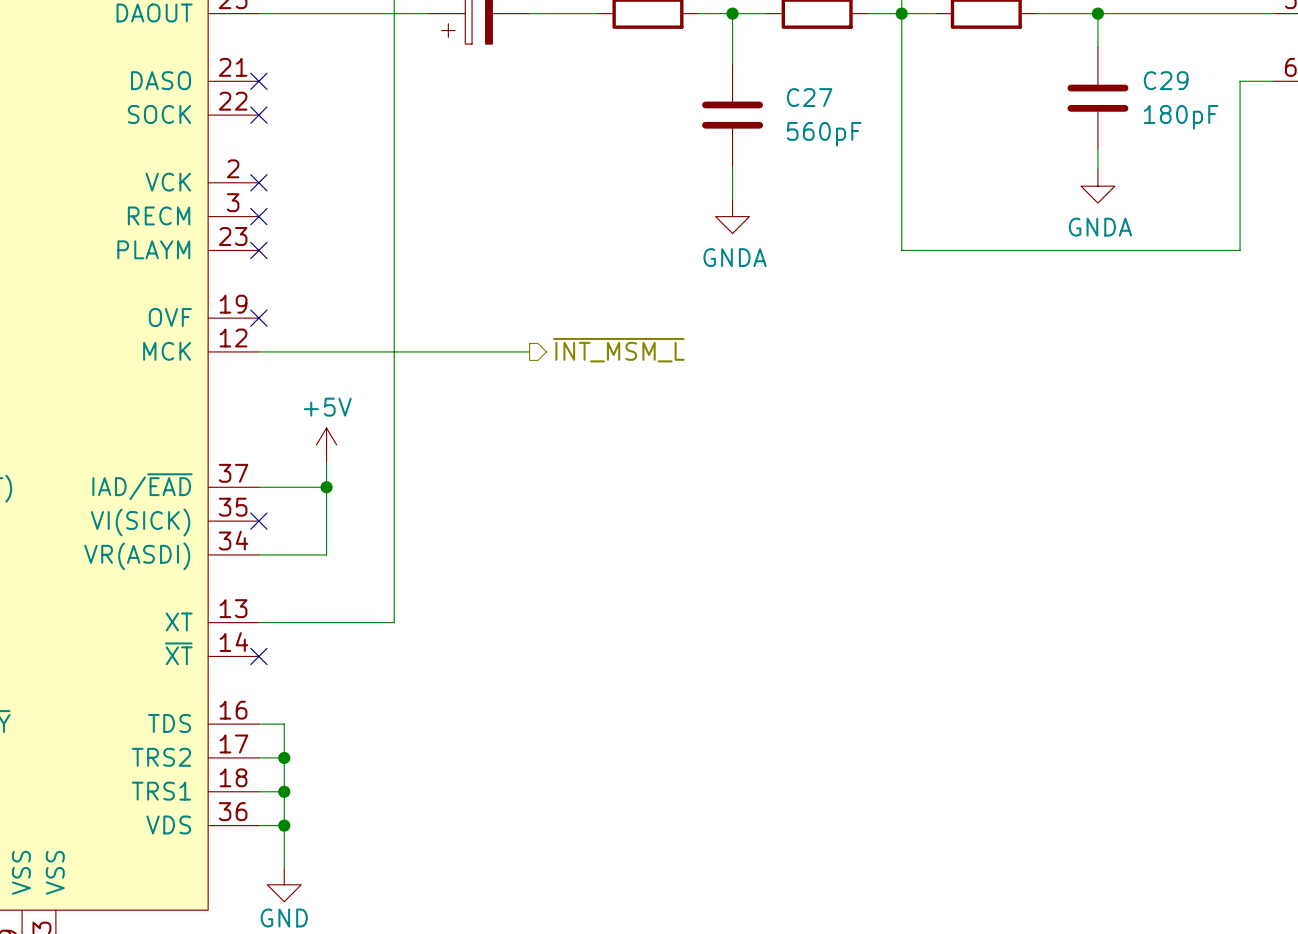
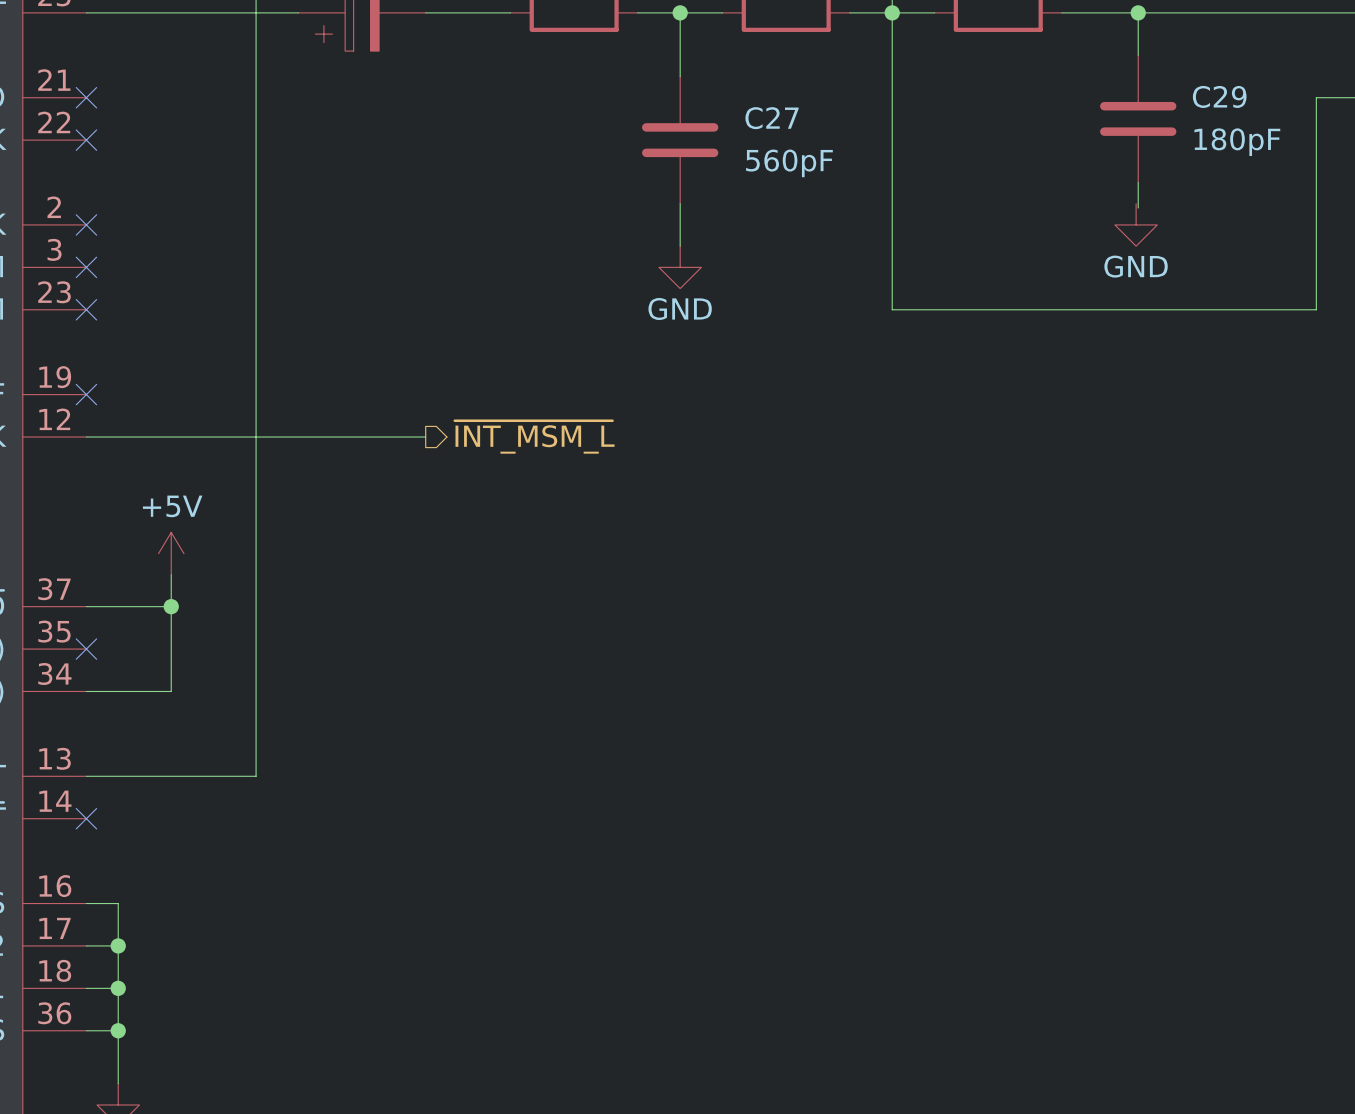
power symbol: GNDA (1097, 186) -> GND (1136, 224)
power symbol: GNDA (732, 216) -> GND (680, 267)

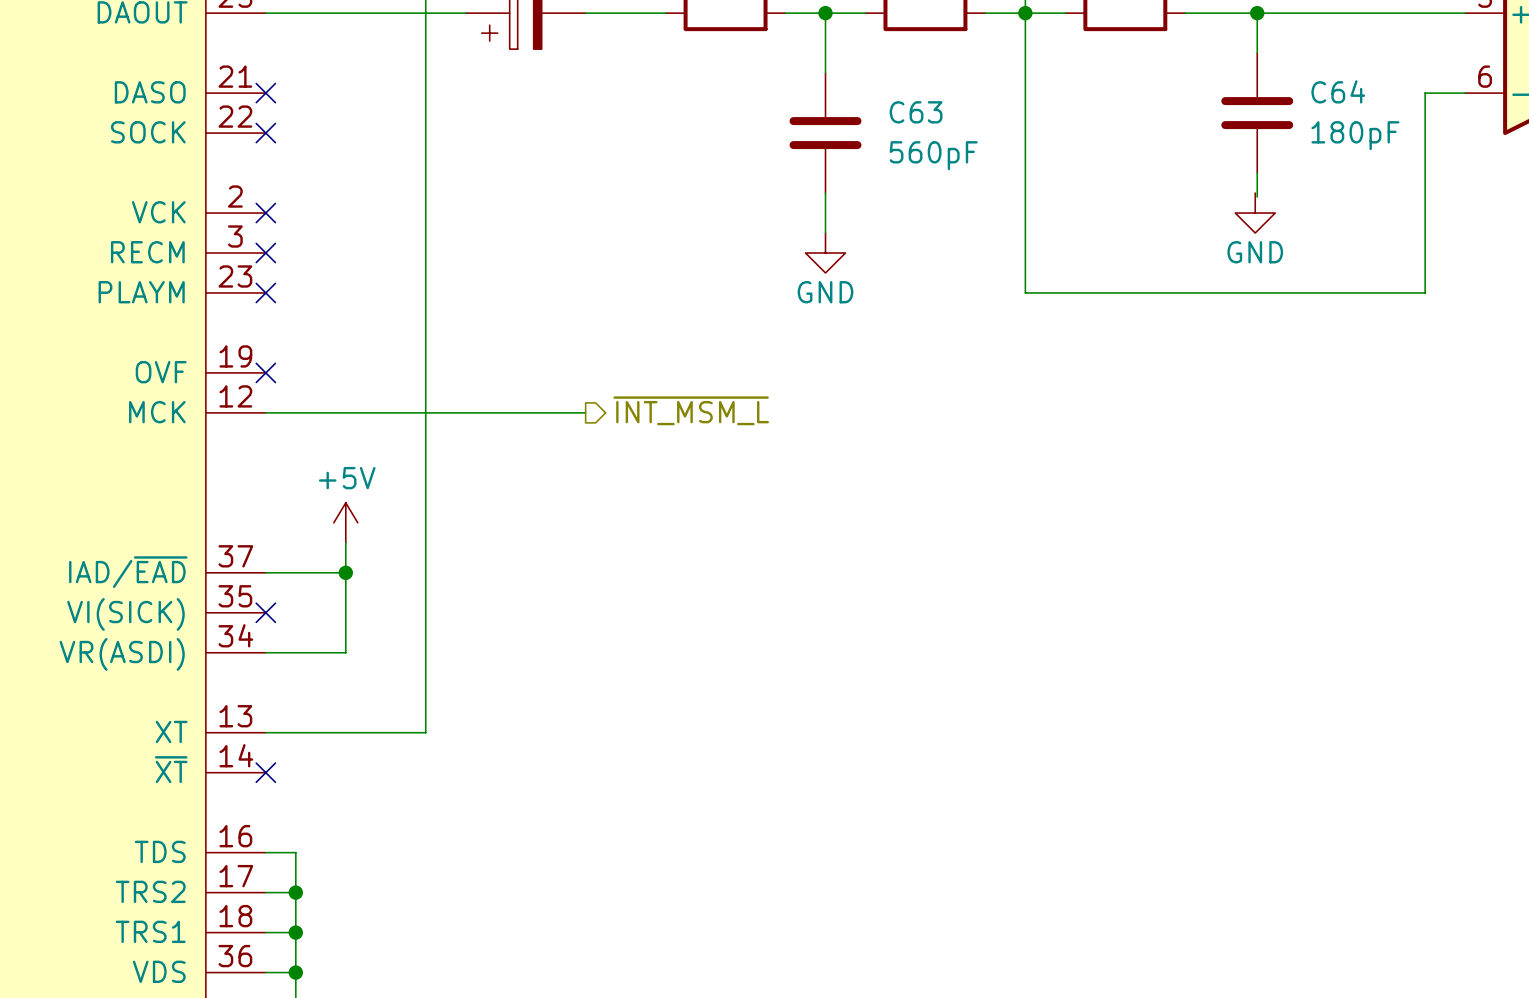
C29 name: C29 (1219, 96) -> C64 (1338, 91)
C27 name: C27 (772, 118) -> C63 (916, 112)

